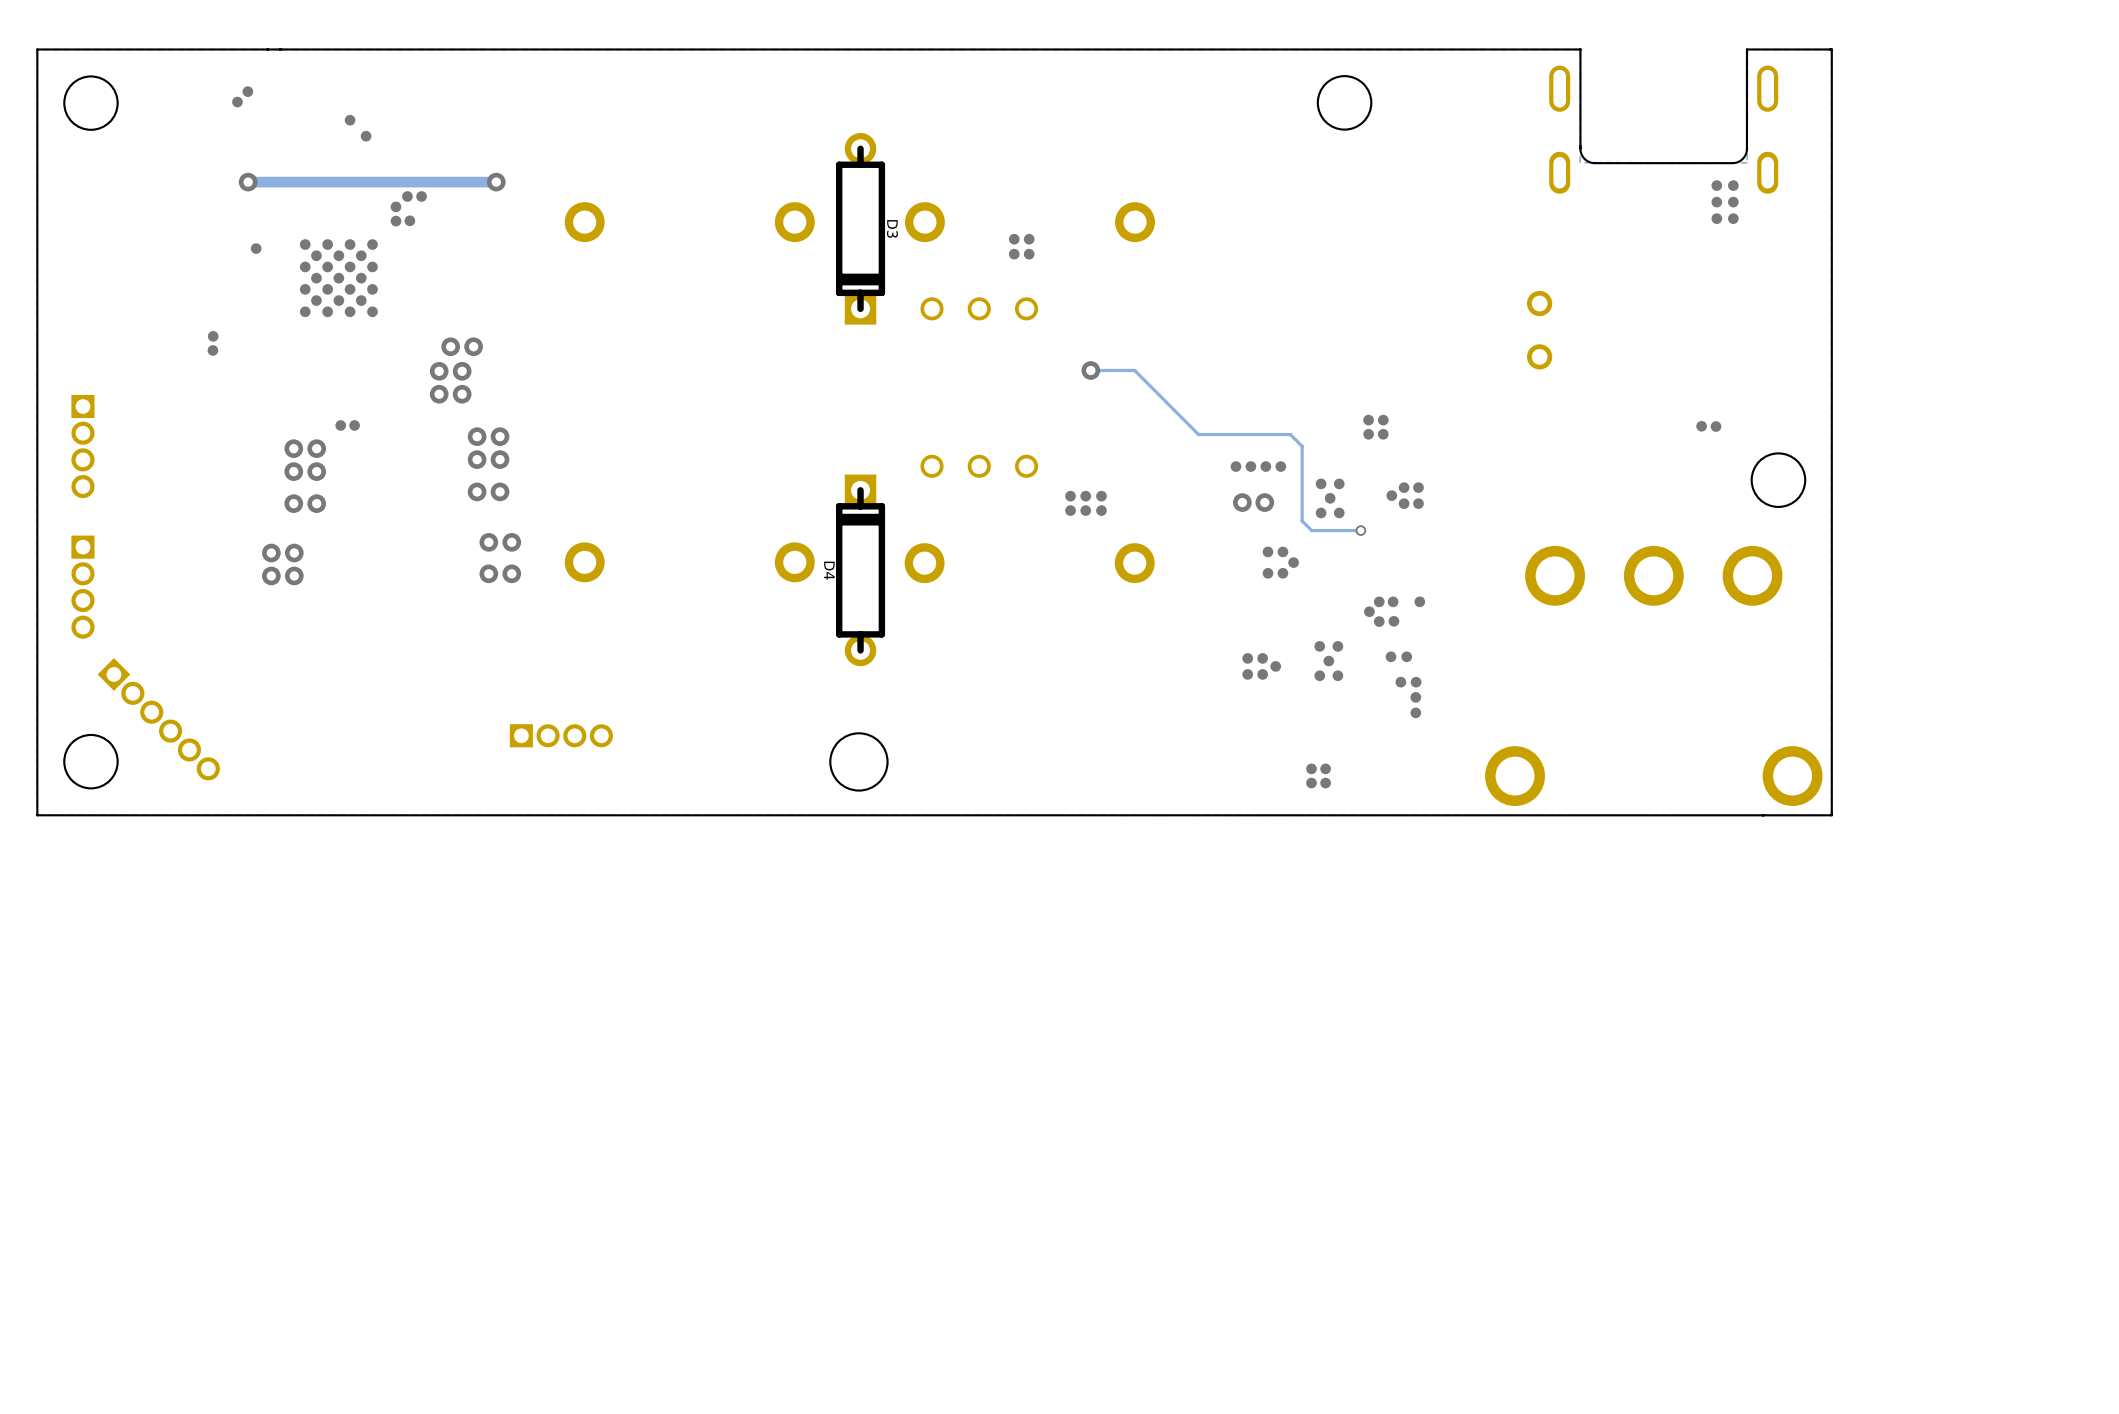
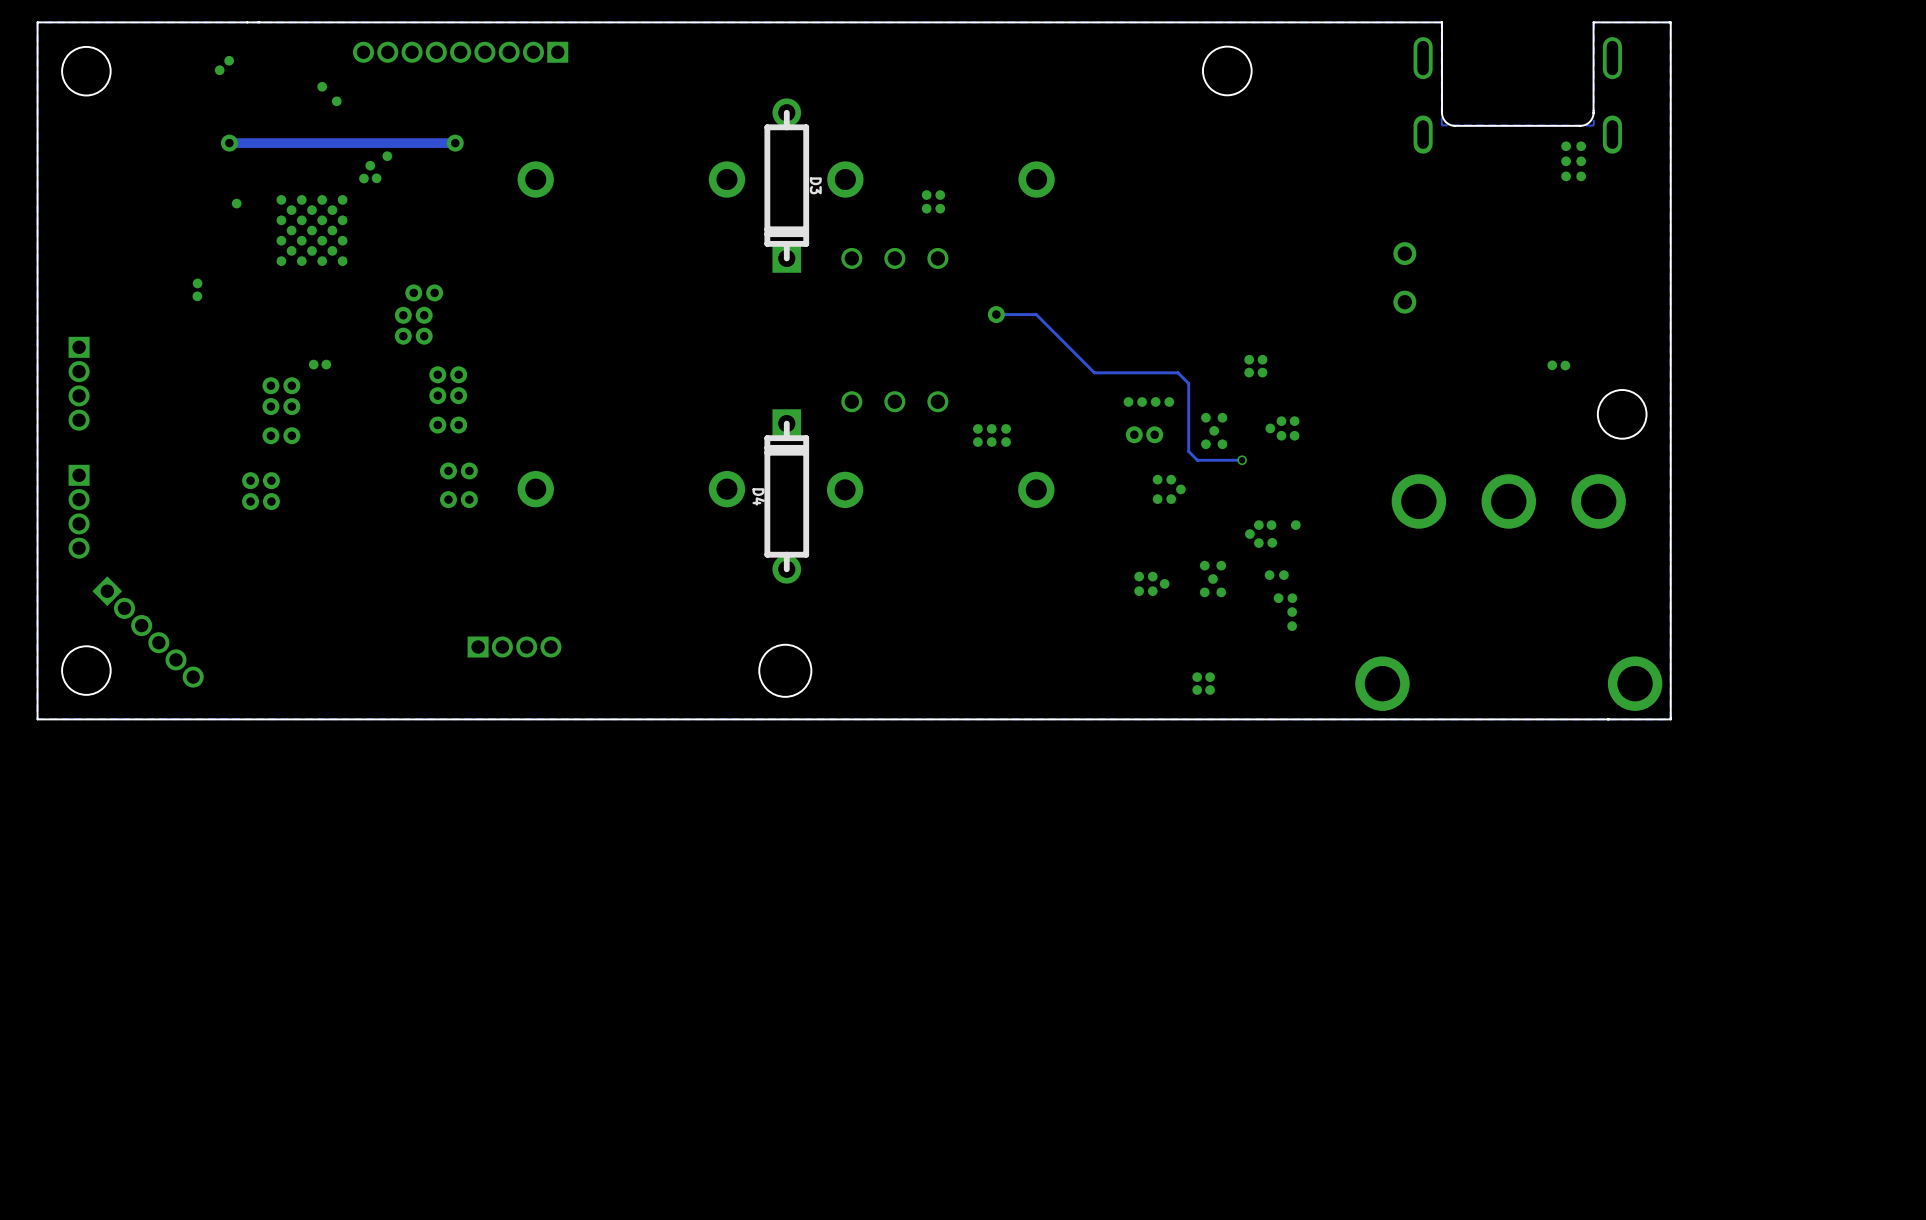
part: none -> (460, 52)
via: (407, 196) -> none
via: (395, 206) -> none
via: none -> (370, 165)

